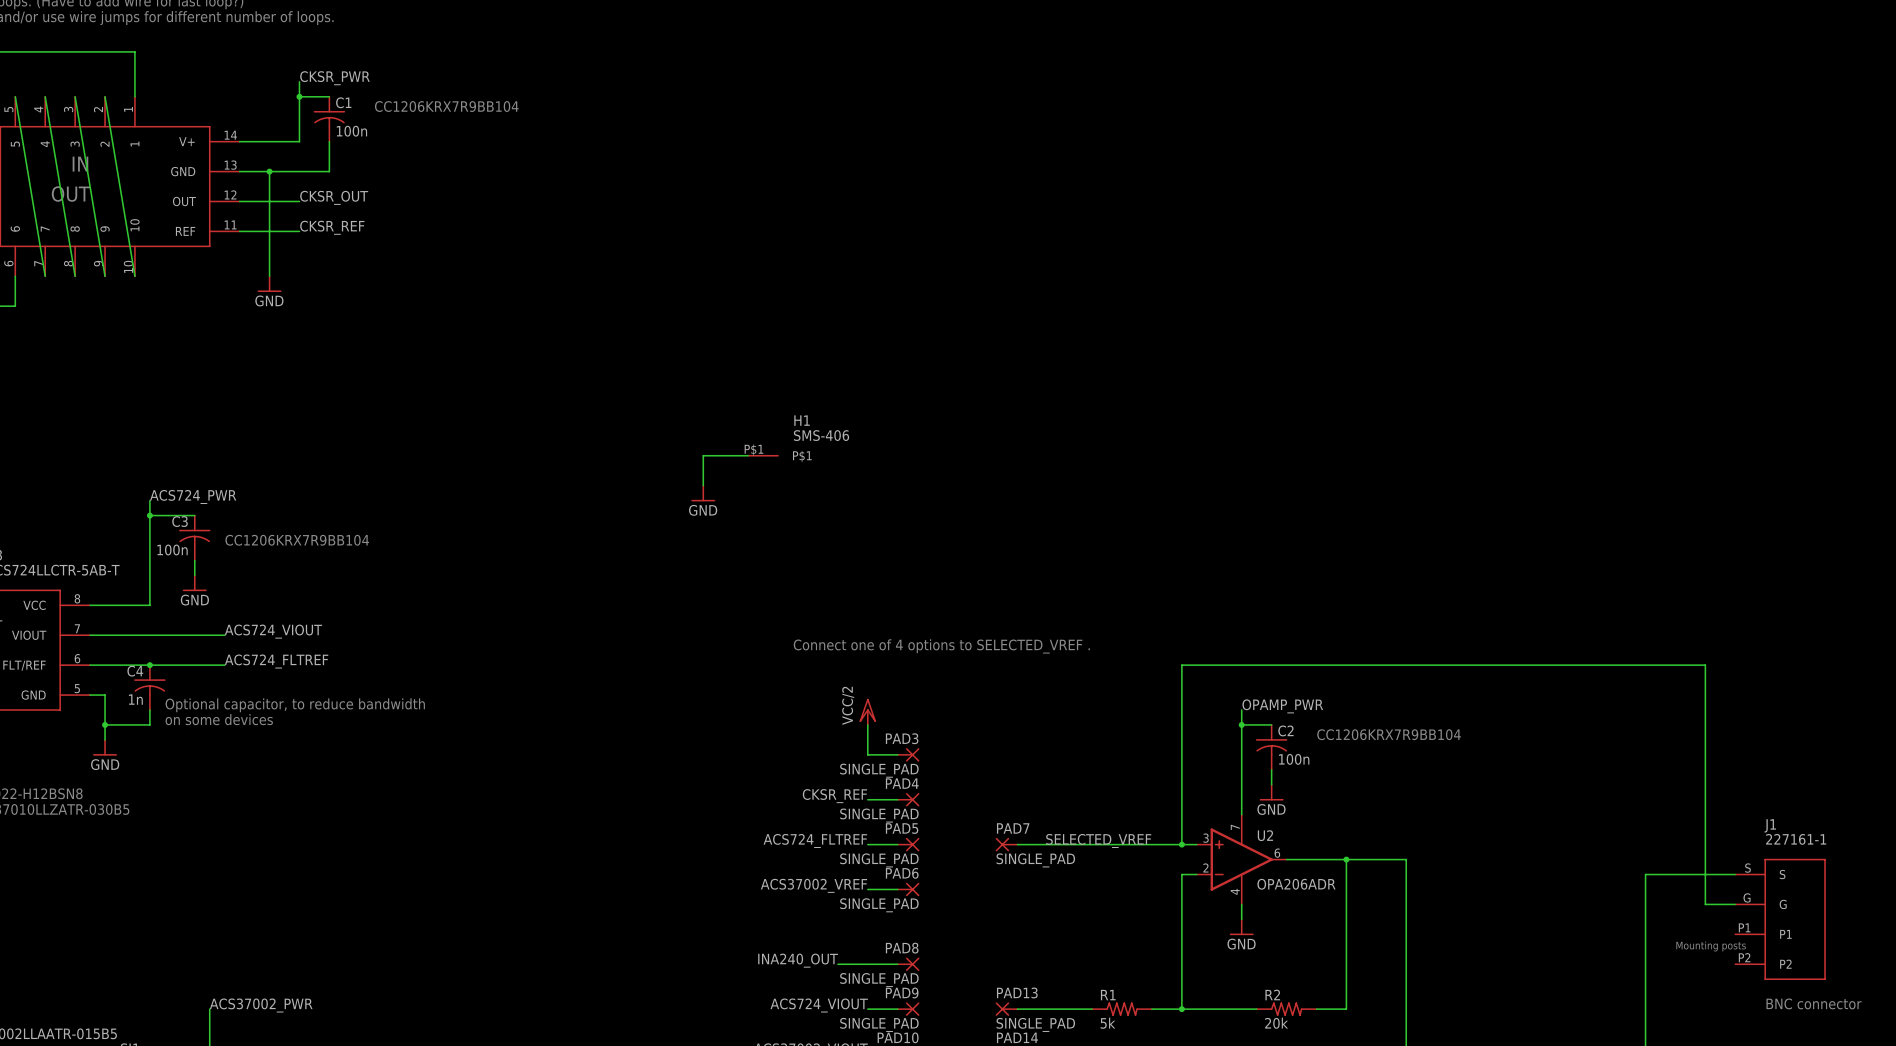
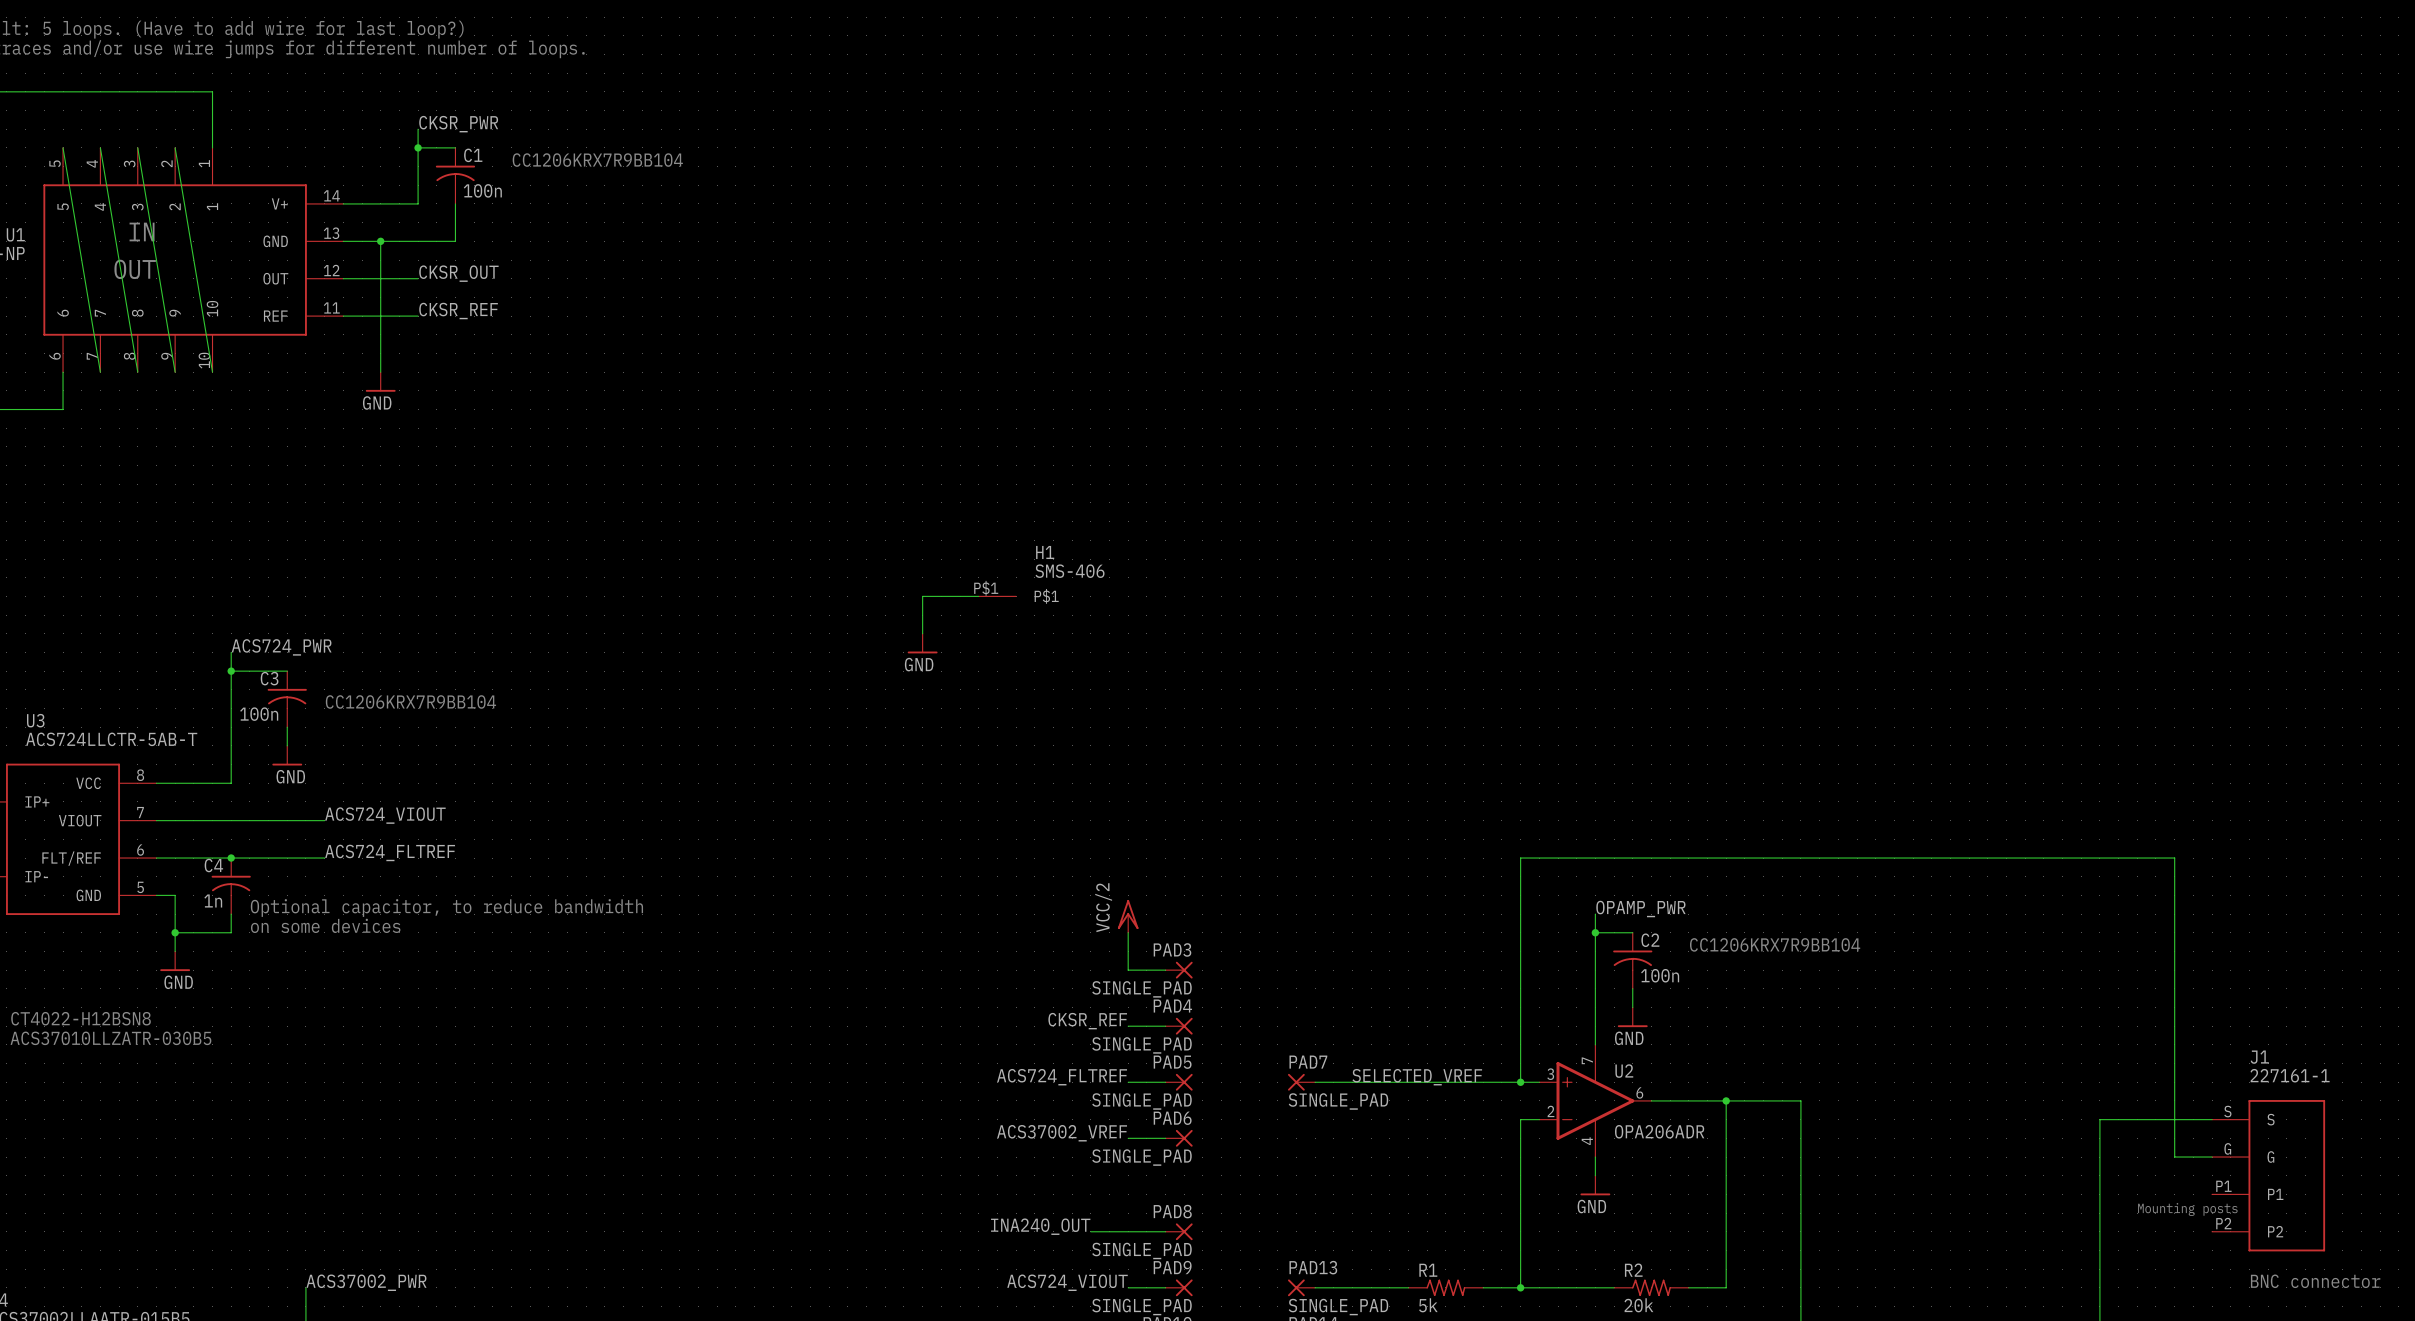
text: Connect one of 4 options to SELECTED_VREF . (941, 646) -> none

